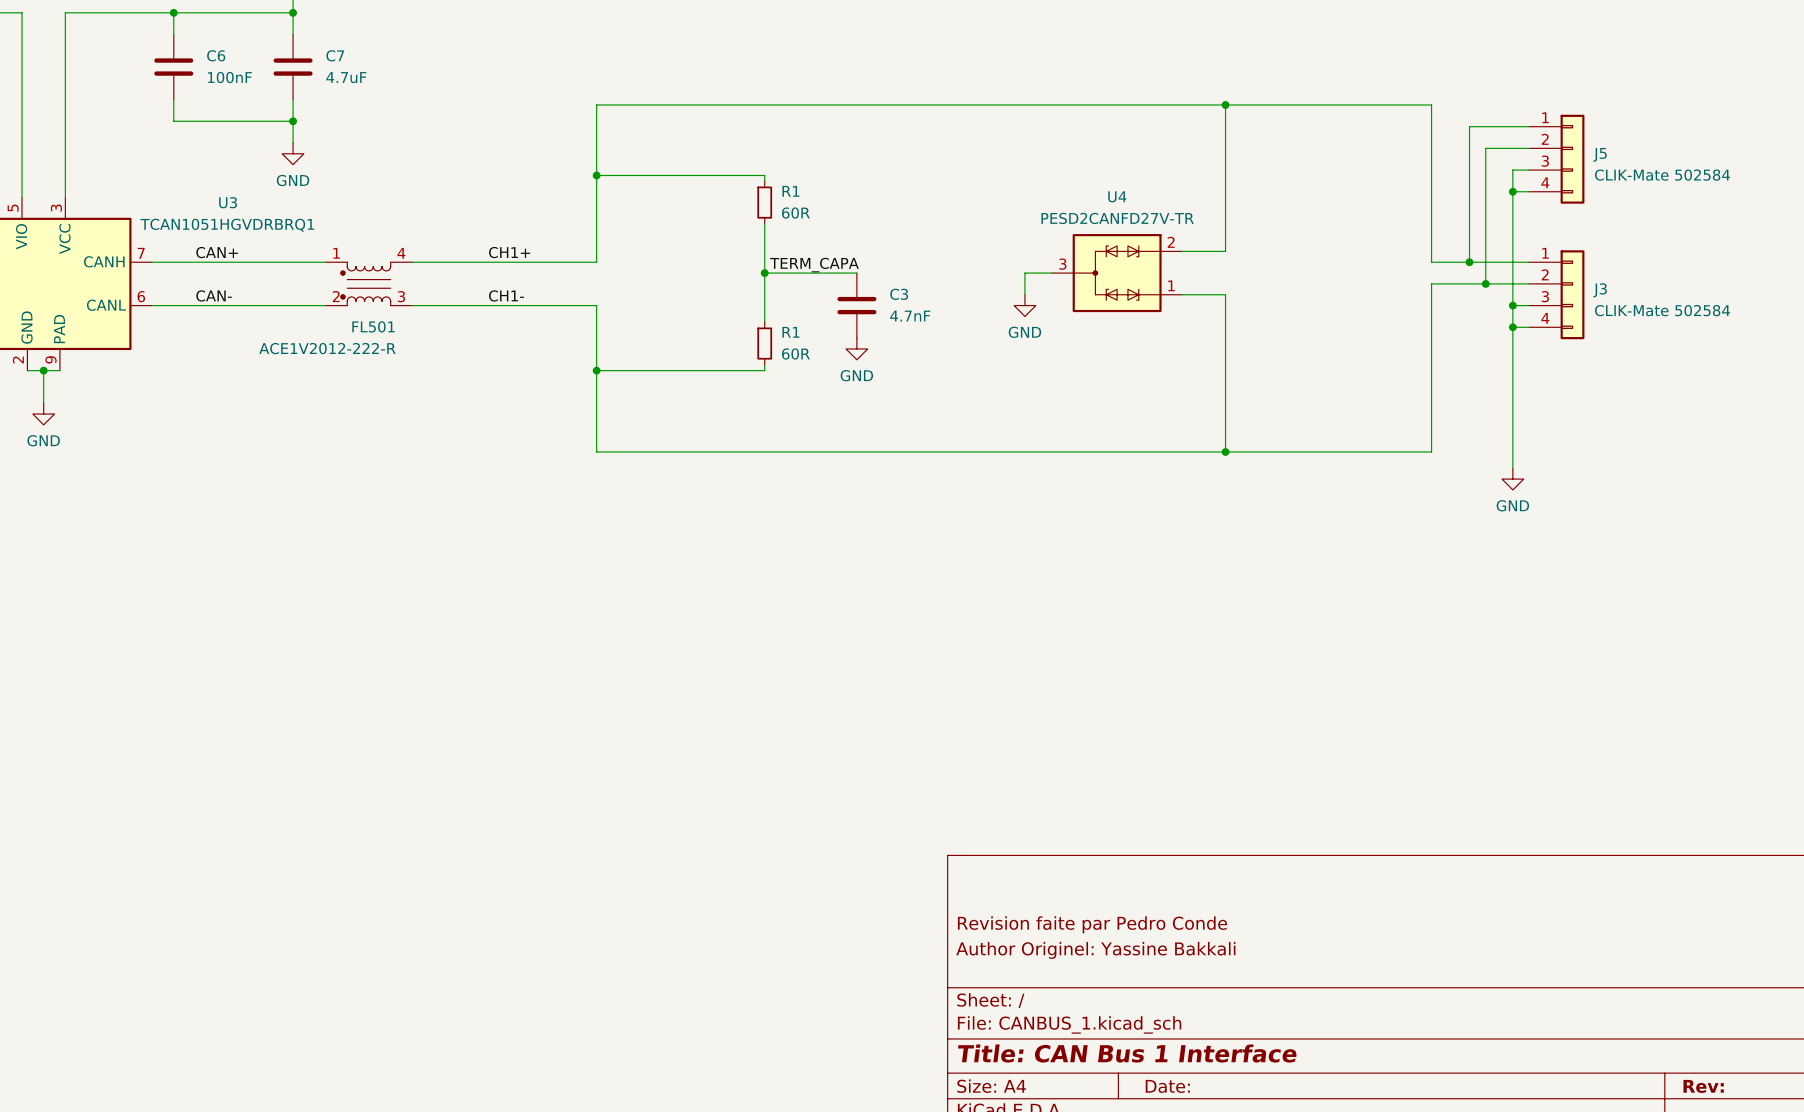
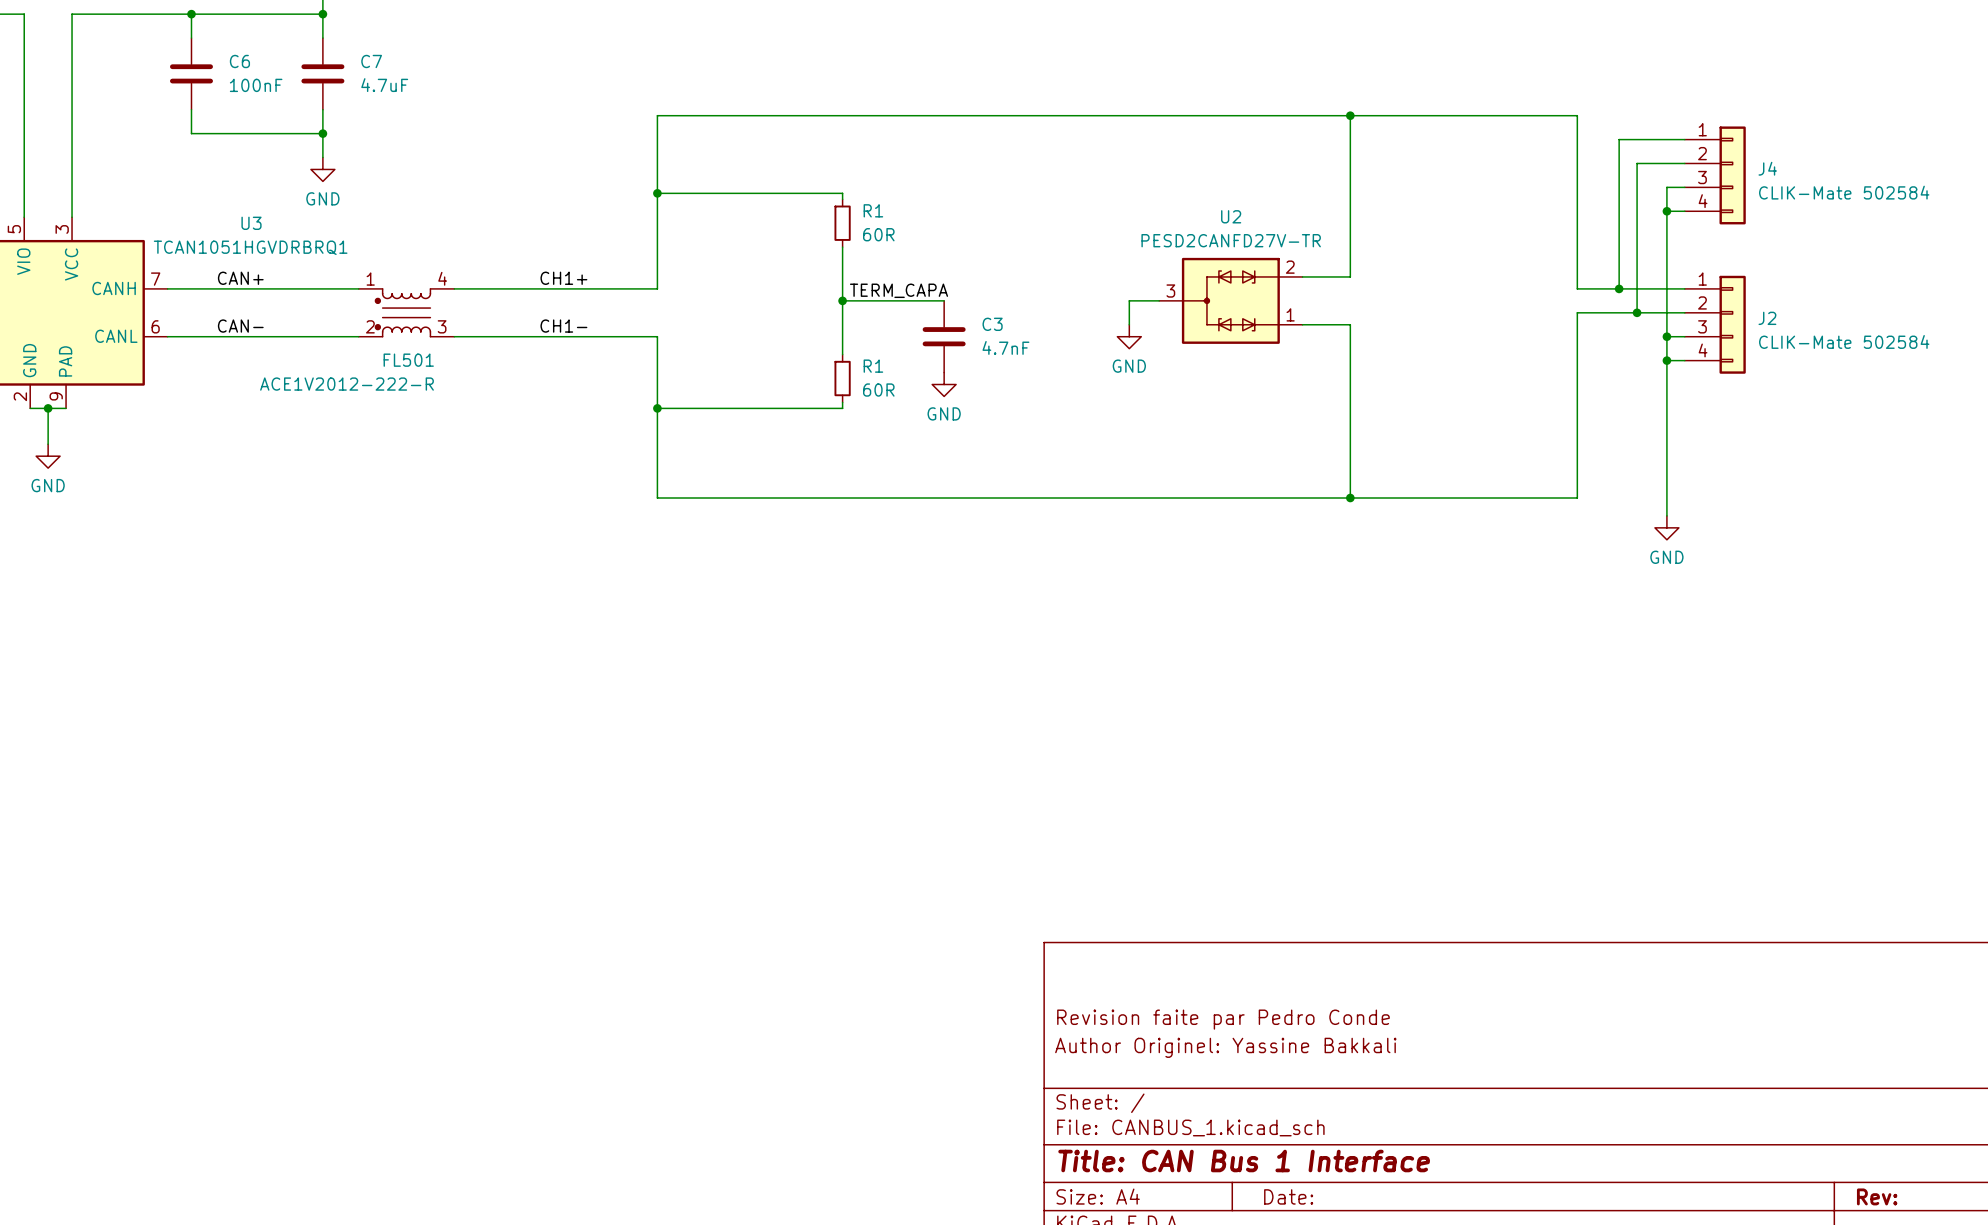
J5 name: J5 (1600, 154) -> J4 (1767, 168)
U4 name: U4 (1117, 196) -> U2 (1231, 216)
J3 name: J3 (1600, 290) -> J2 (1767, 318)

